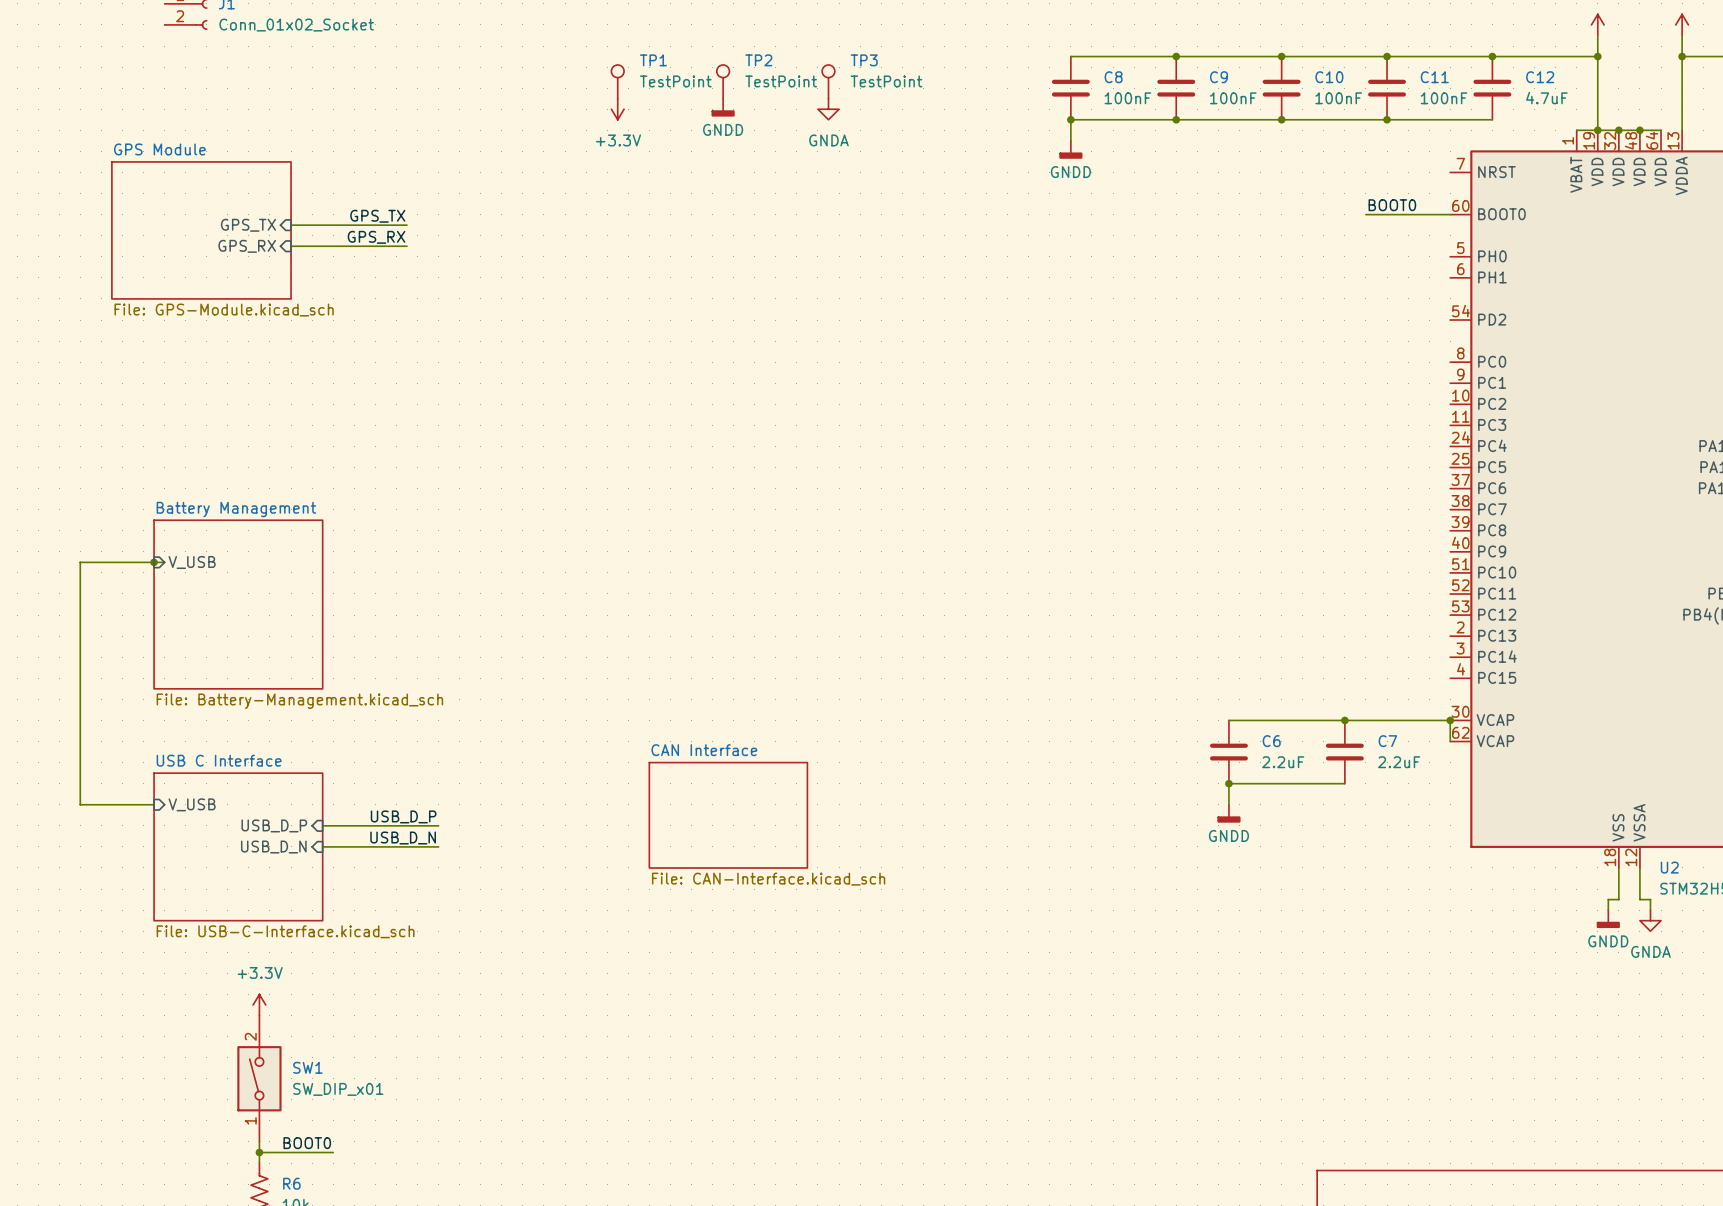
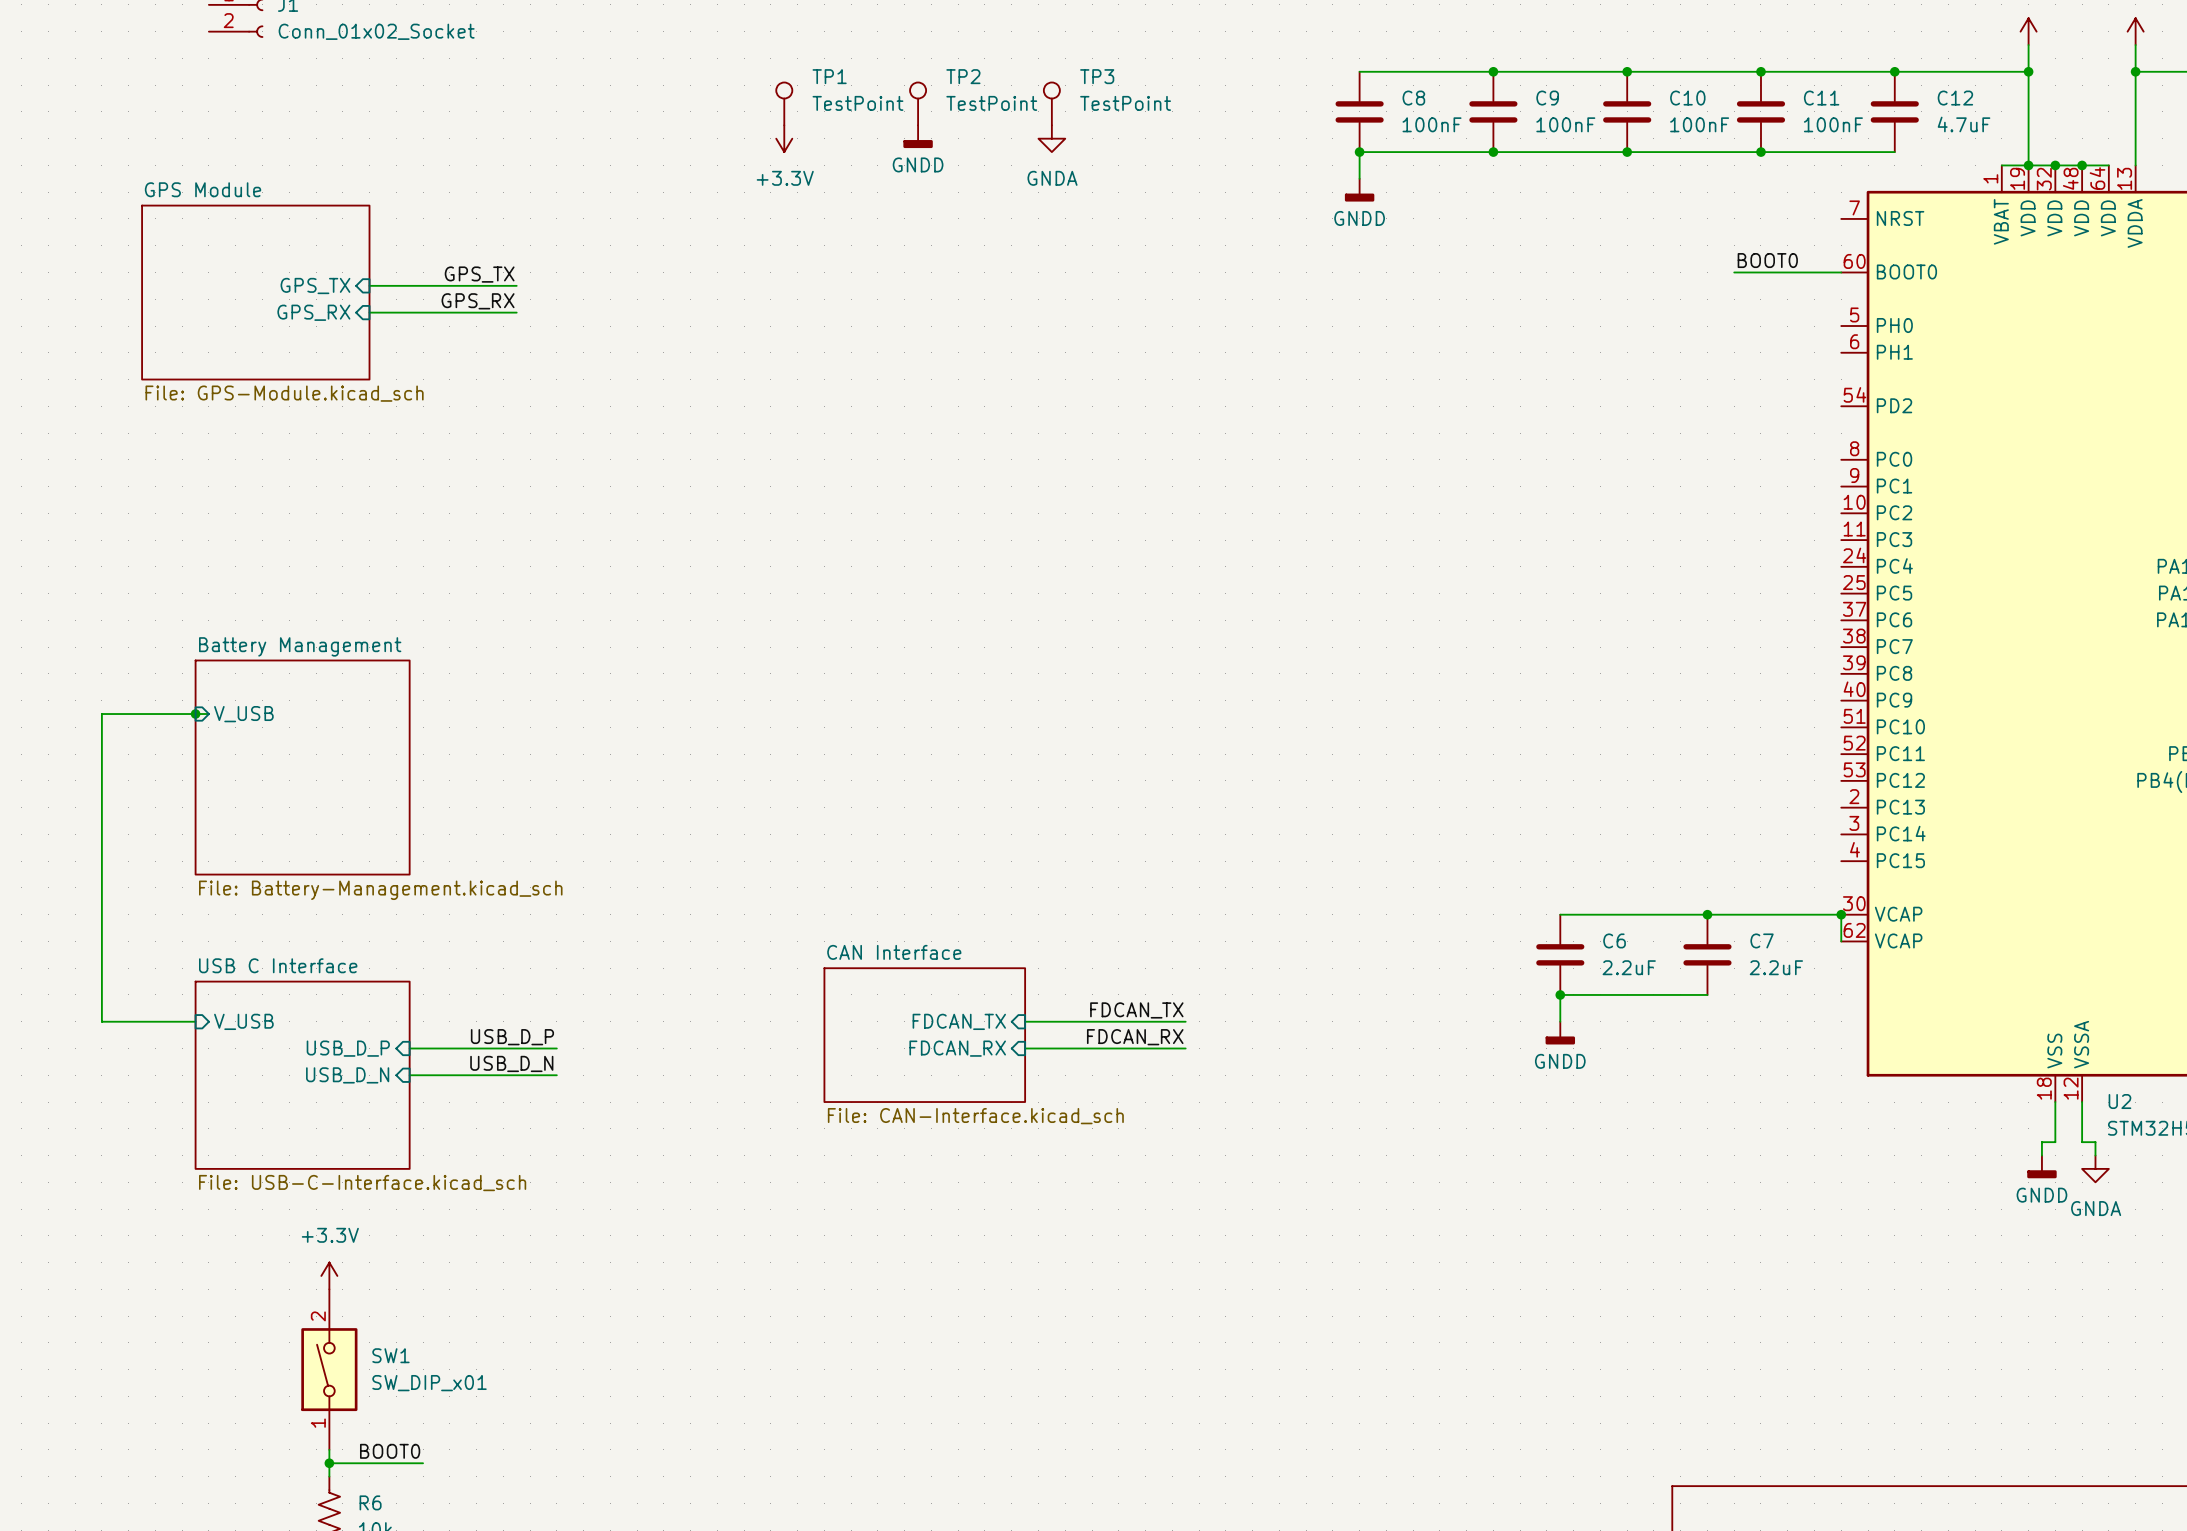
label: none -> FDCAN_TX (1136, 1010)
sheet pin: none -> FDCAN_TX (959, 1021)
wire: none -> (1025, 1021) (1185, 1021)
label: none -> FDCAN_RX (1135, 1037)
sheet pin: none -> FDCAN_RX (957, 1048)
wire: none -> (1025, 1048) (1185, 1048)

